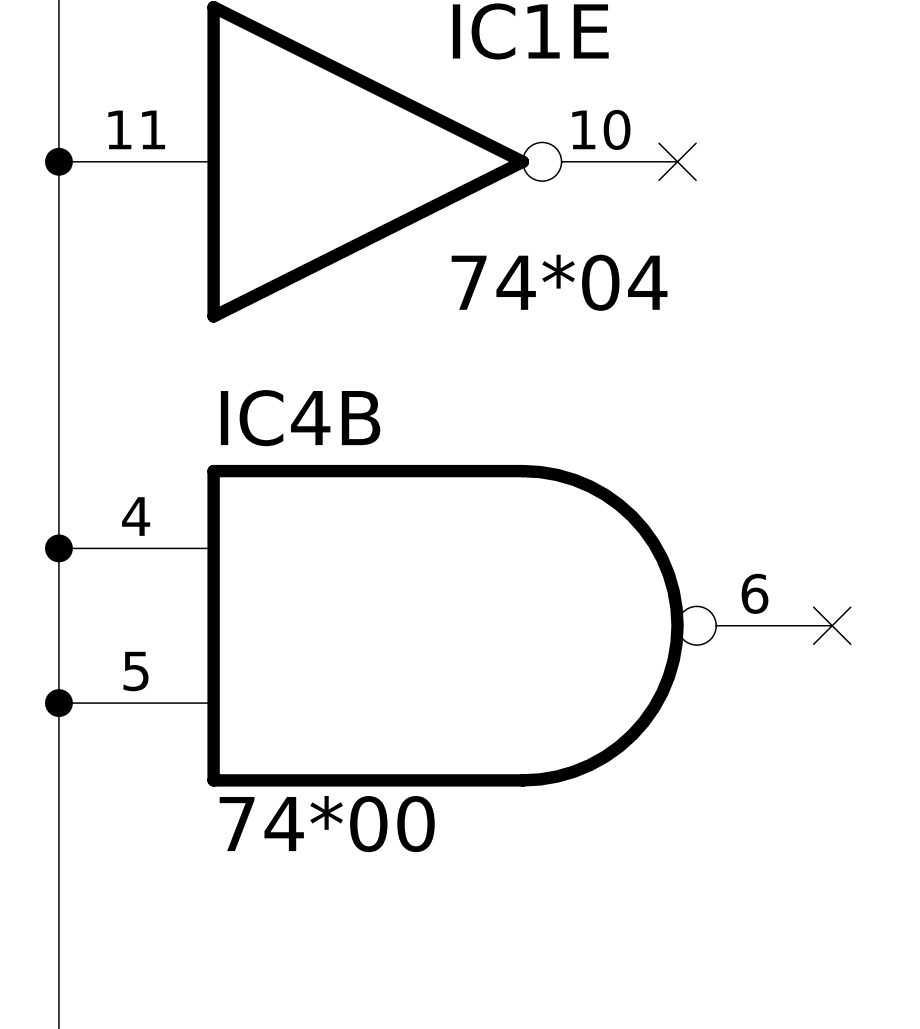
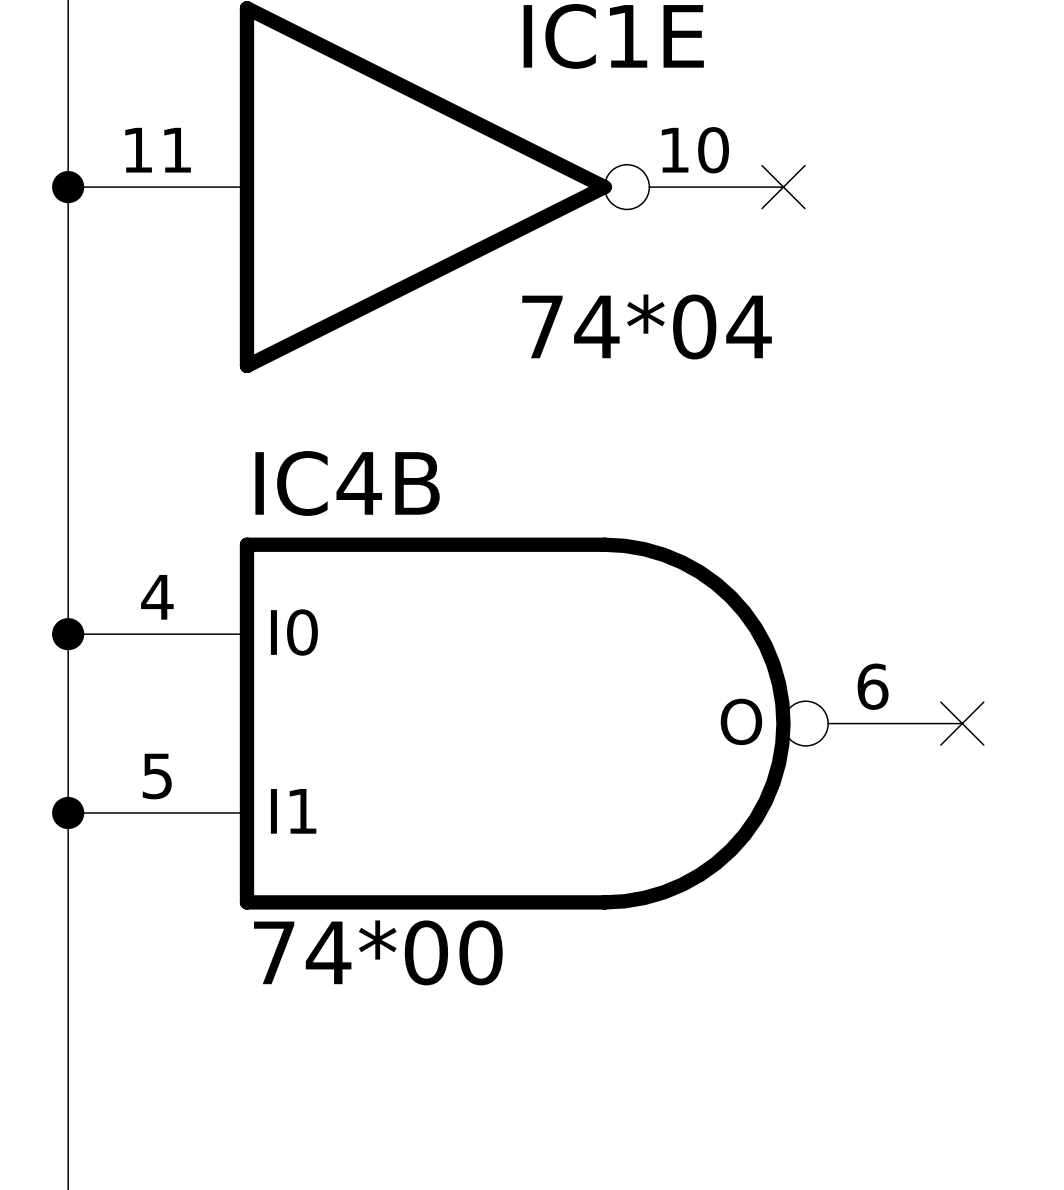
IC4B pin name: none -> I0 (294, 632)
IC4B pin name: none -> O (741, 721)
IC4B pin name: none -> I1 (293, 811)

